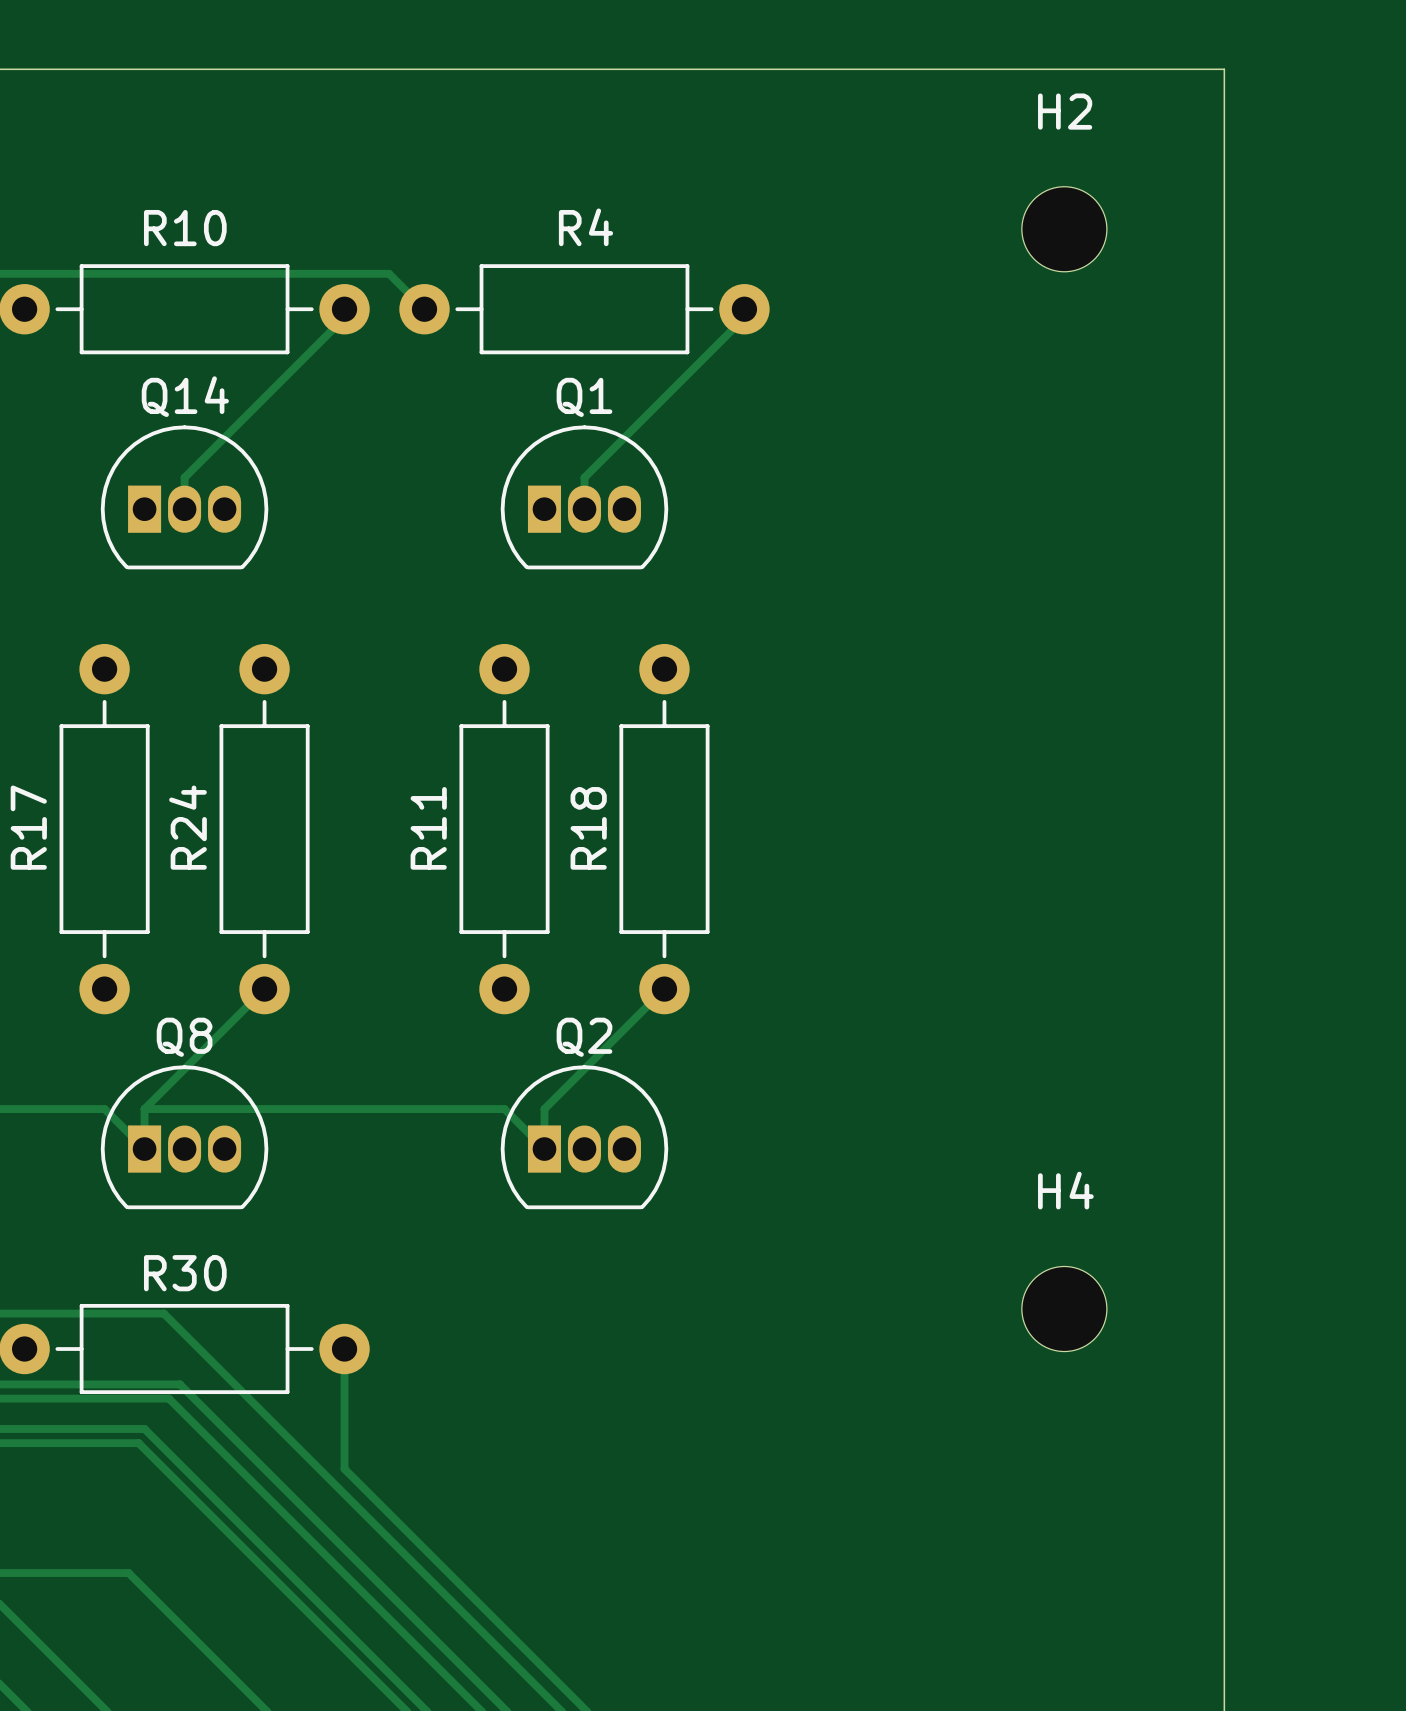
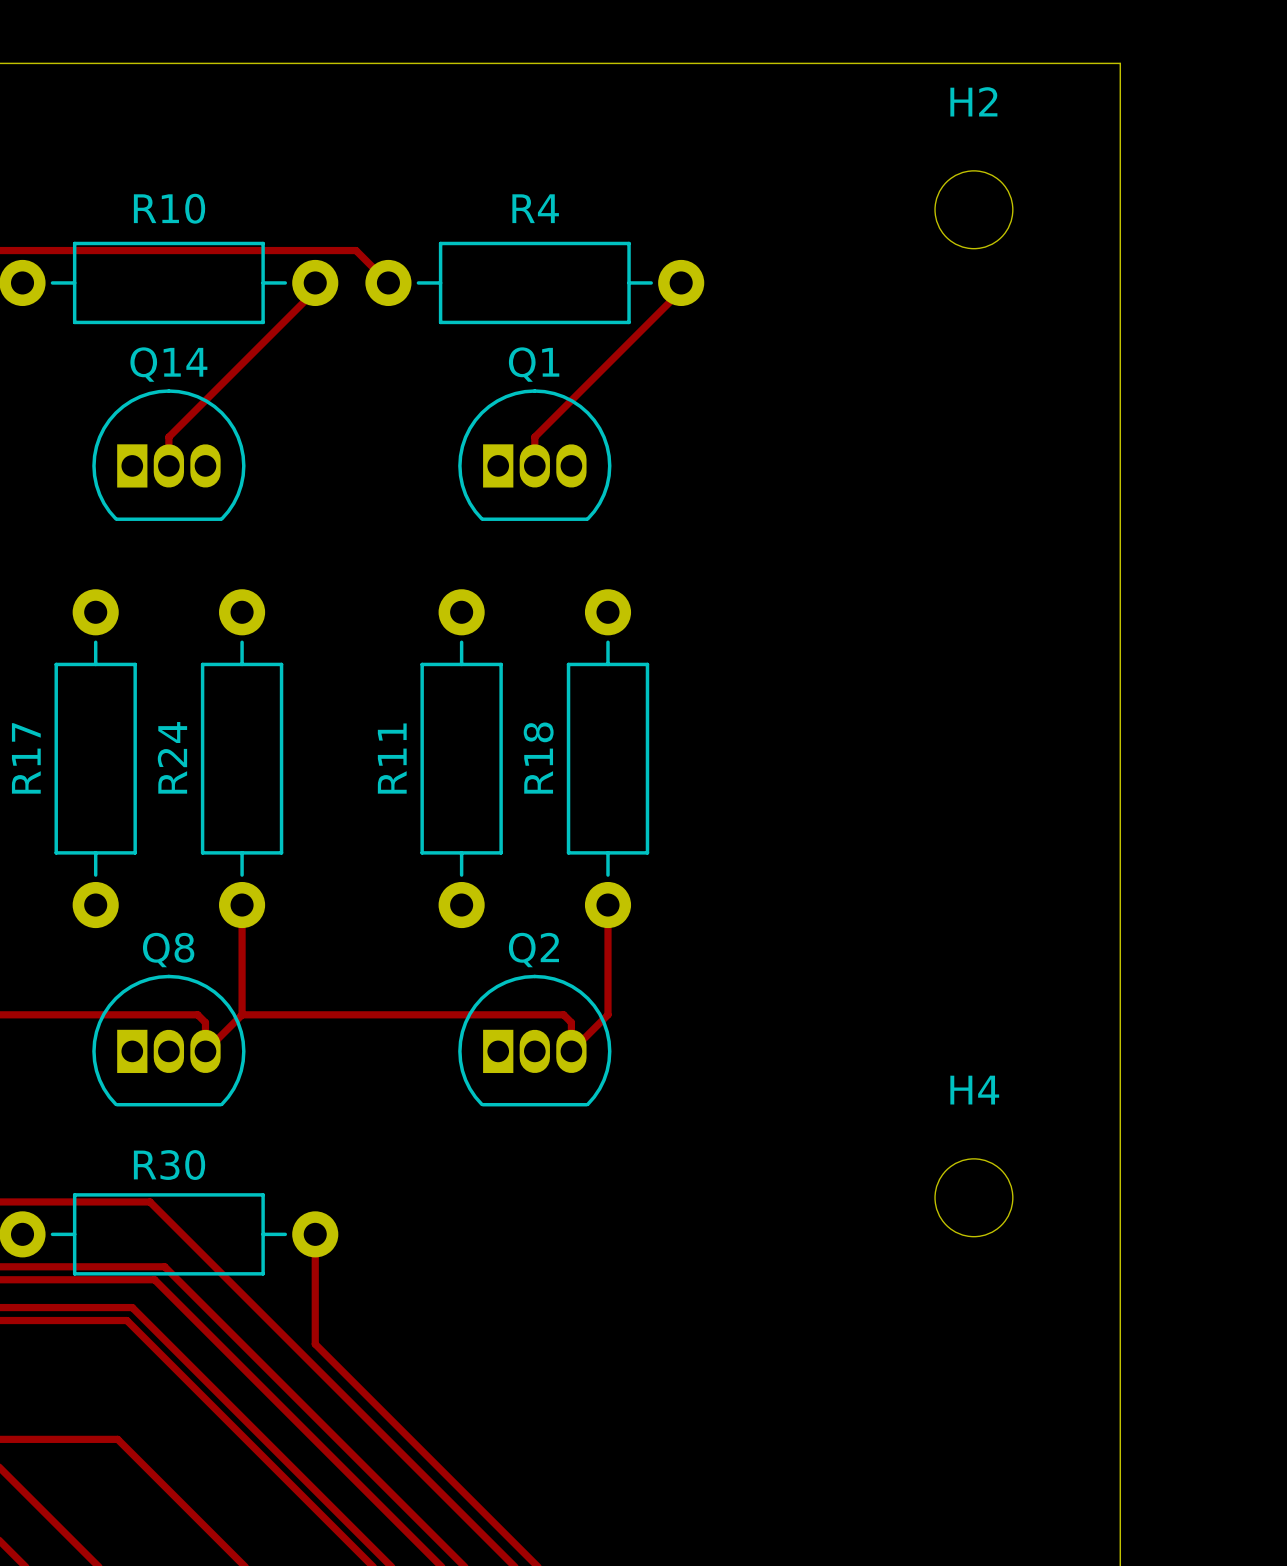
track: (264, 989) (144, 1109) (144, 1149) (104, 1109) -> (242, 905) (242, 1014) (205, 1051) (205, 1022) (197, 1014)
track: (664, 989) (544, 1109) (544, 1149) (504, 1109) -> (608, 905) (608, 1014) (571, 1051) (571, 1022) (563, 1014) (461, 1014)
track: none -> (95, 1014) (132, 1014)
track: (216, 1109) (264, 1109) -> none

